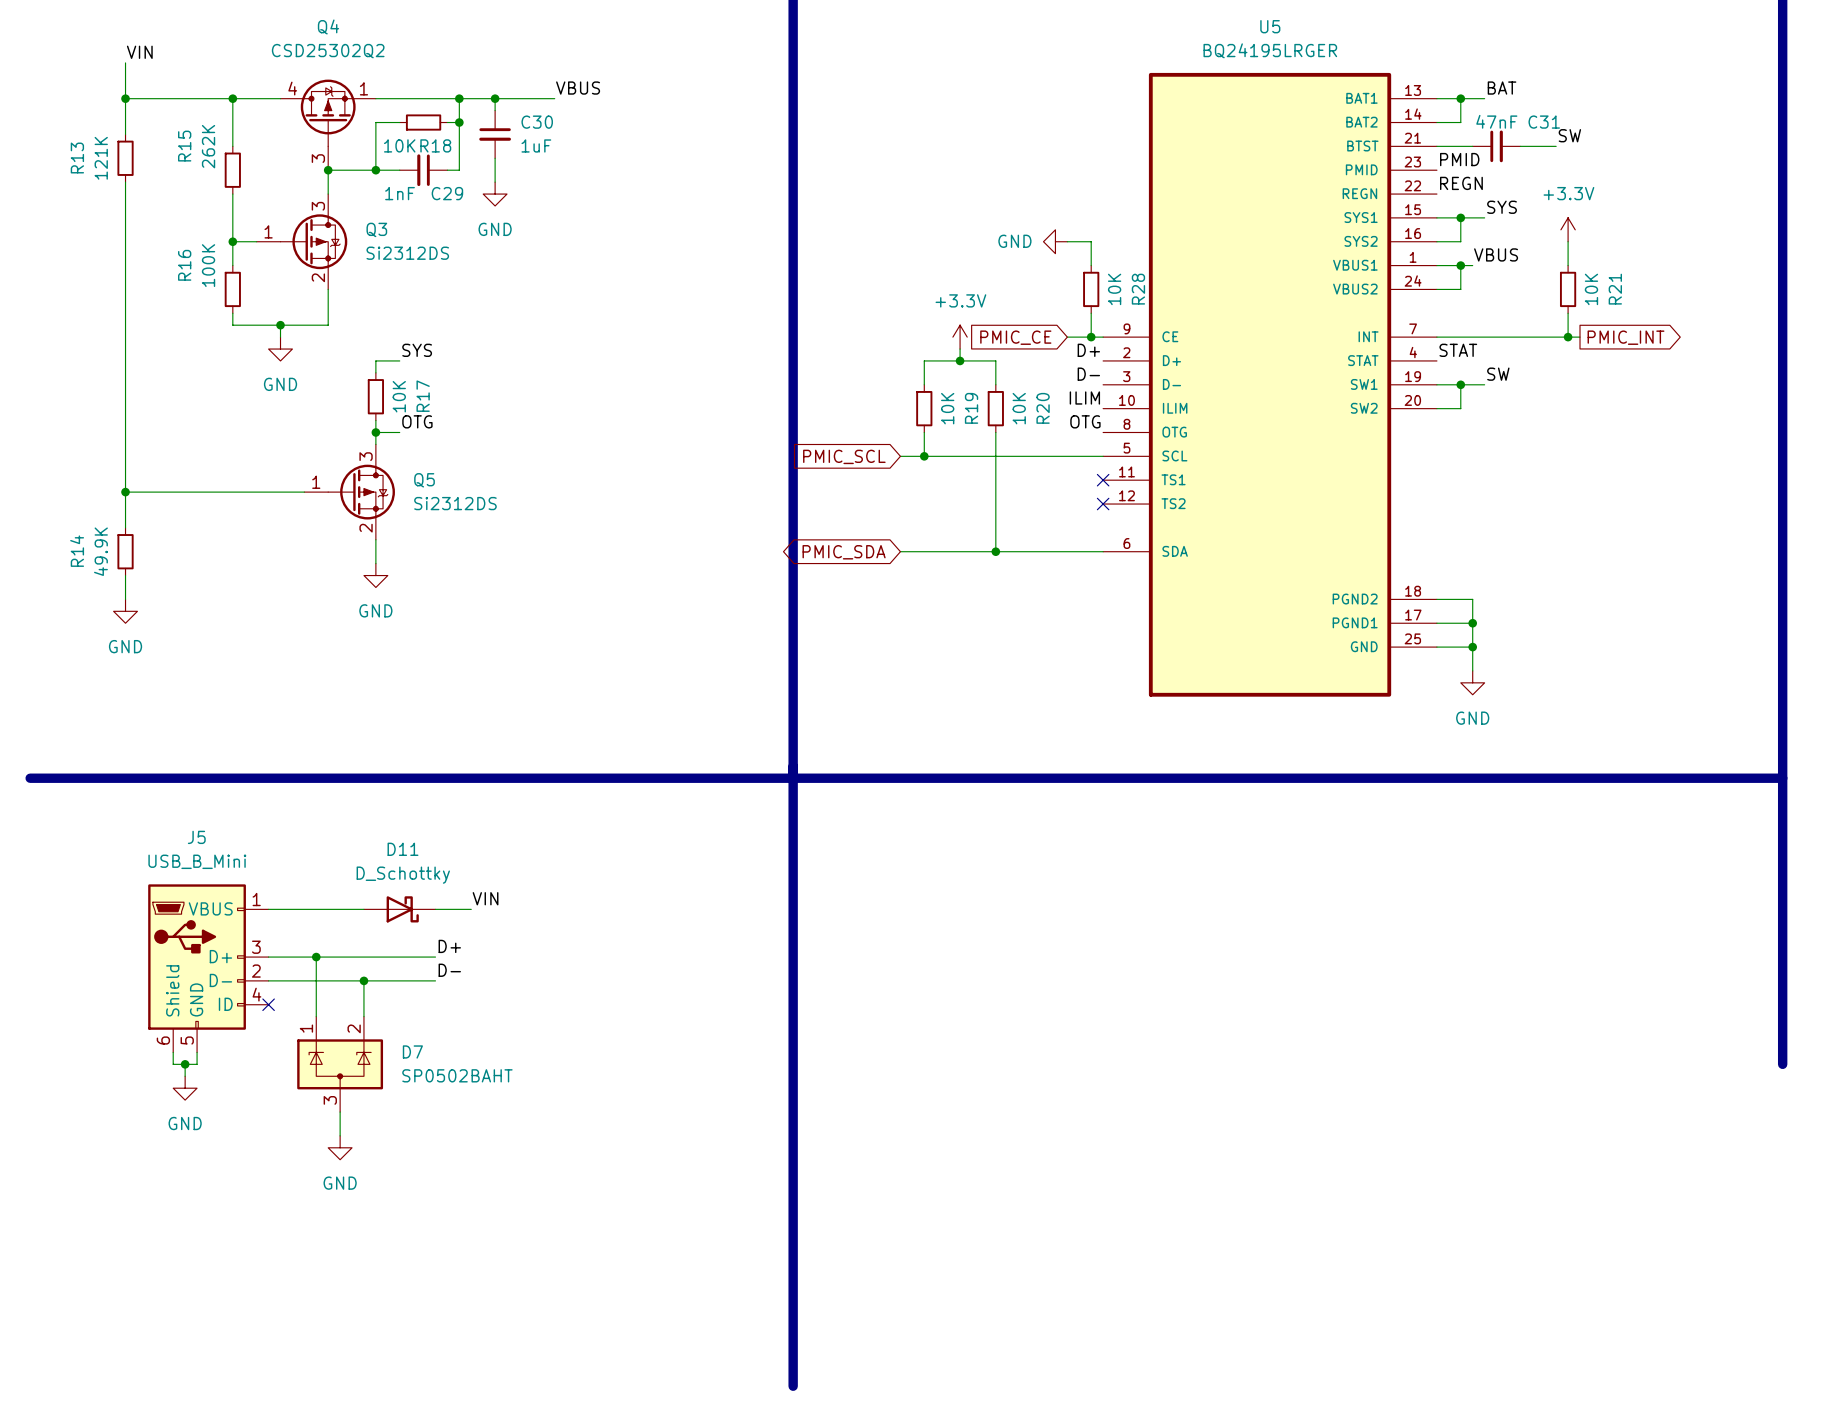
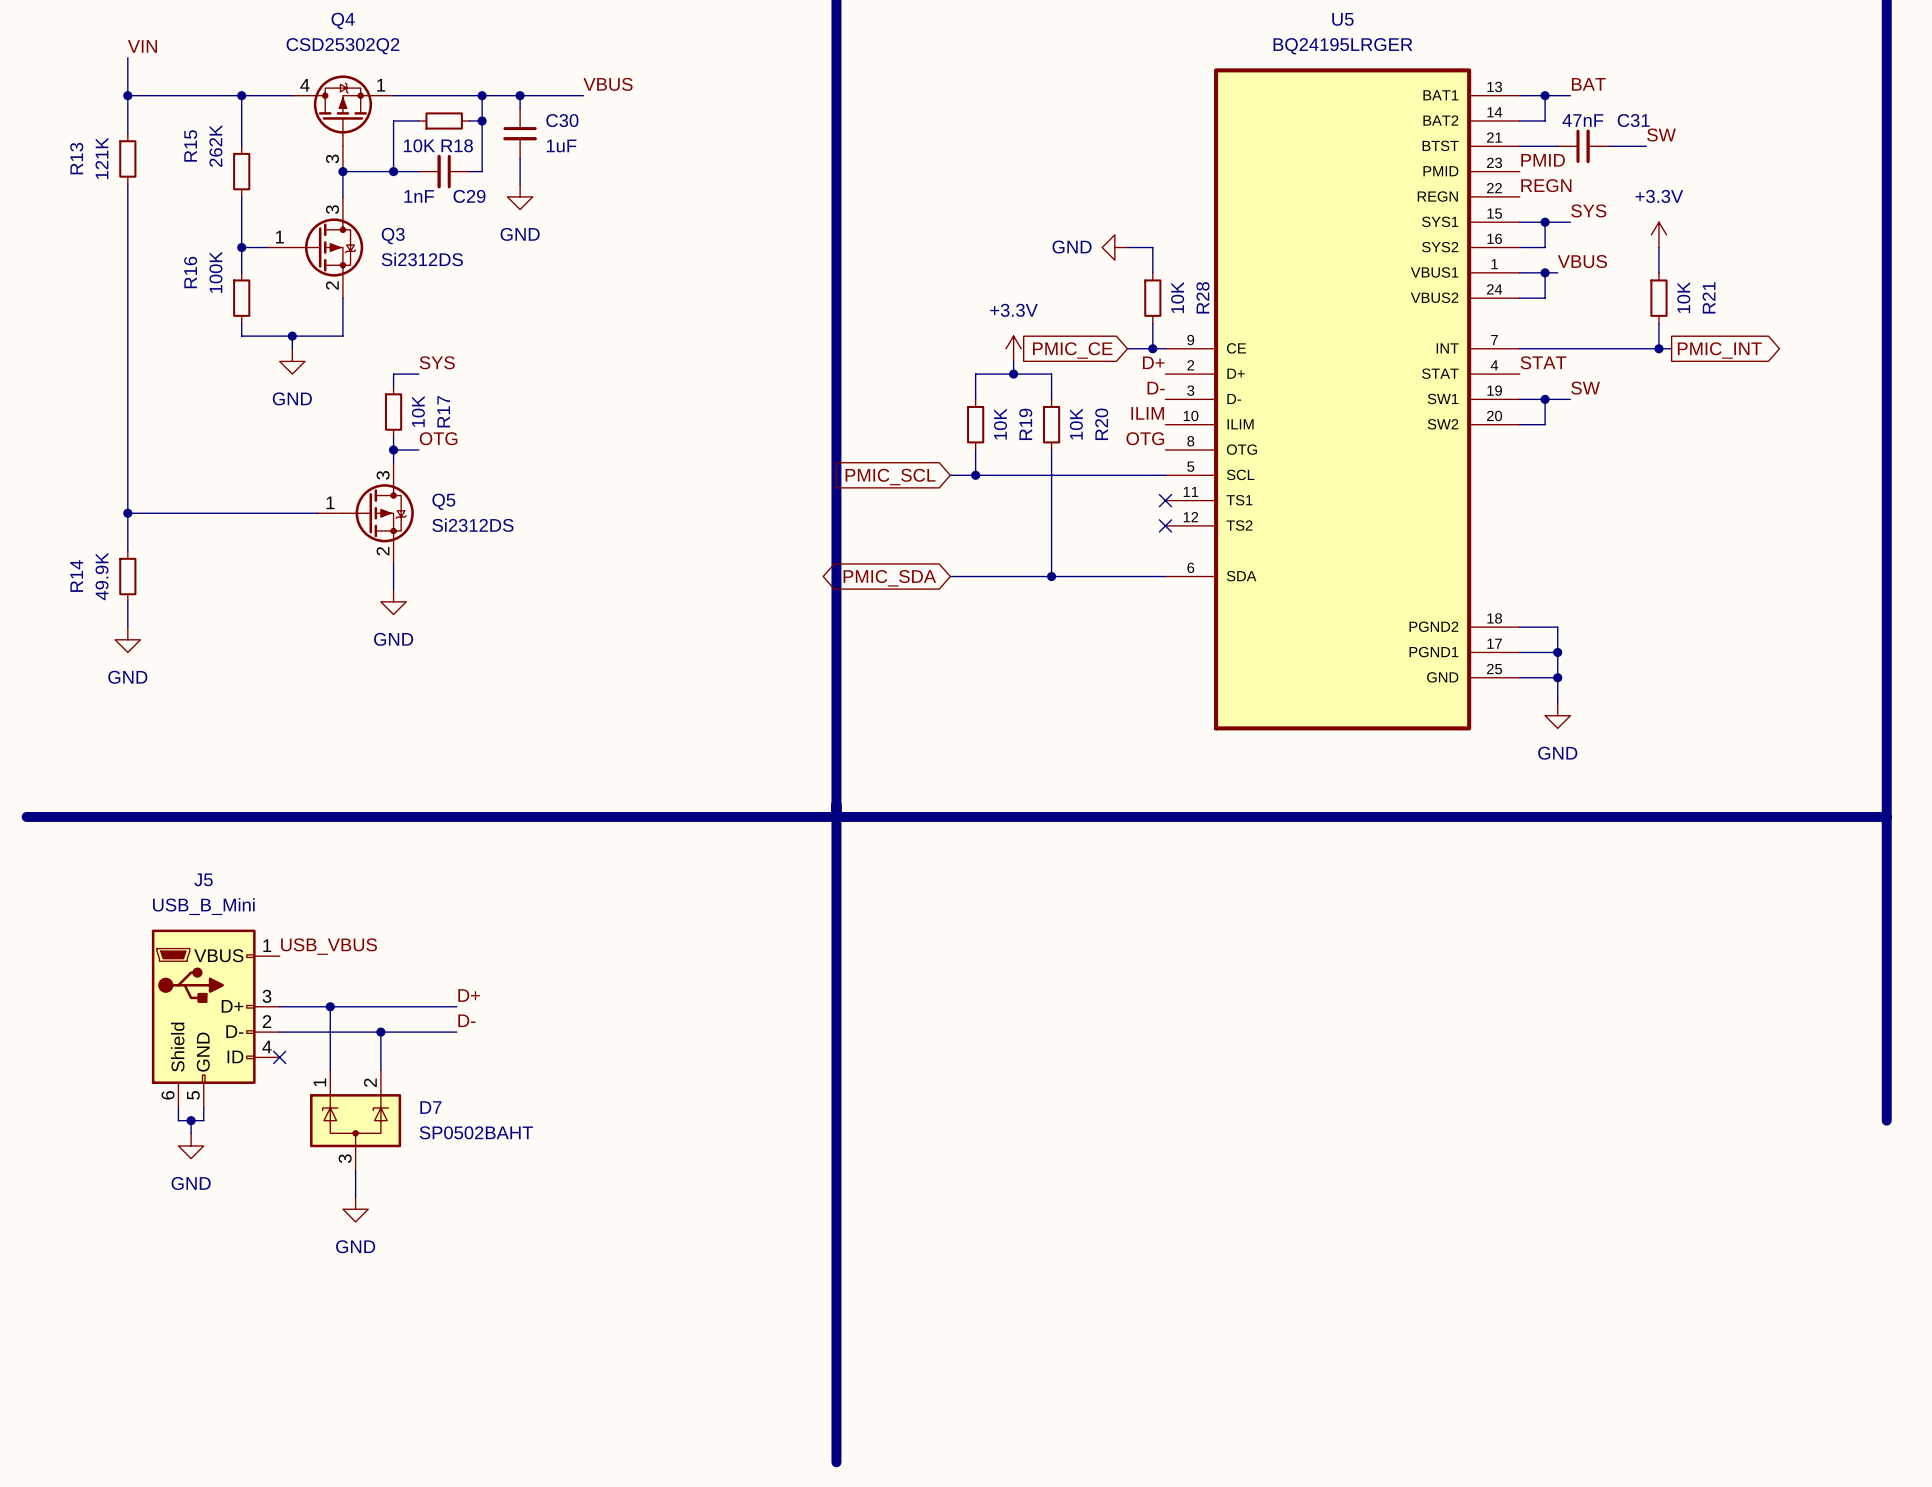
label: VIN (485, 898) -> none
label: none -> USB_VBUS (329, 946)
wire: (268, 909) (363, 909) -> none
D11: D_Schottky (399, 909) -> none
wire: (435, 909) (471, 909) -> none

